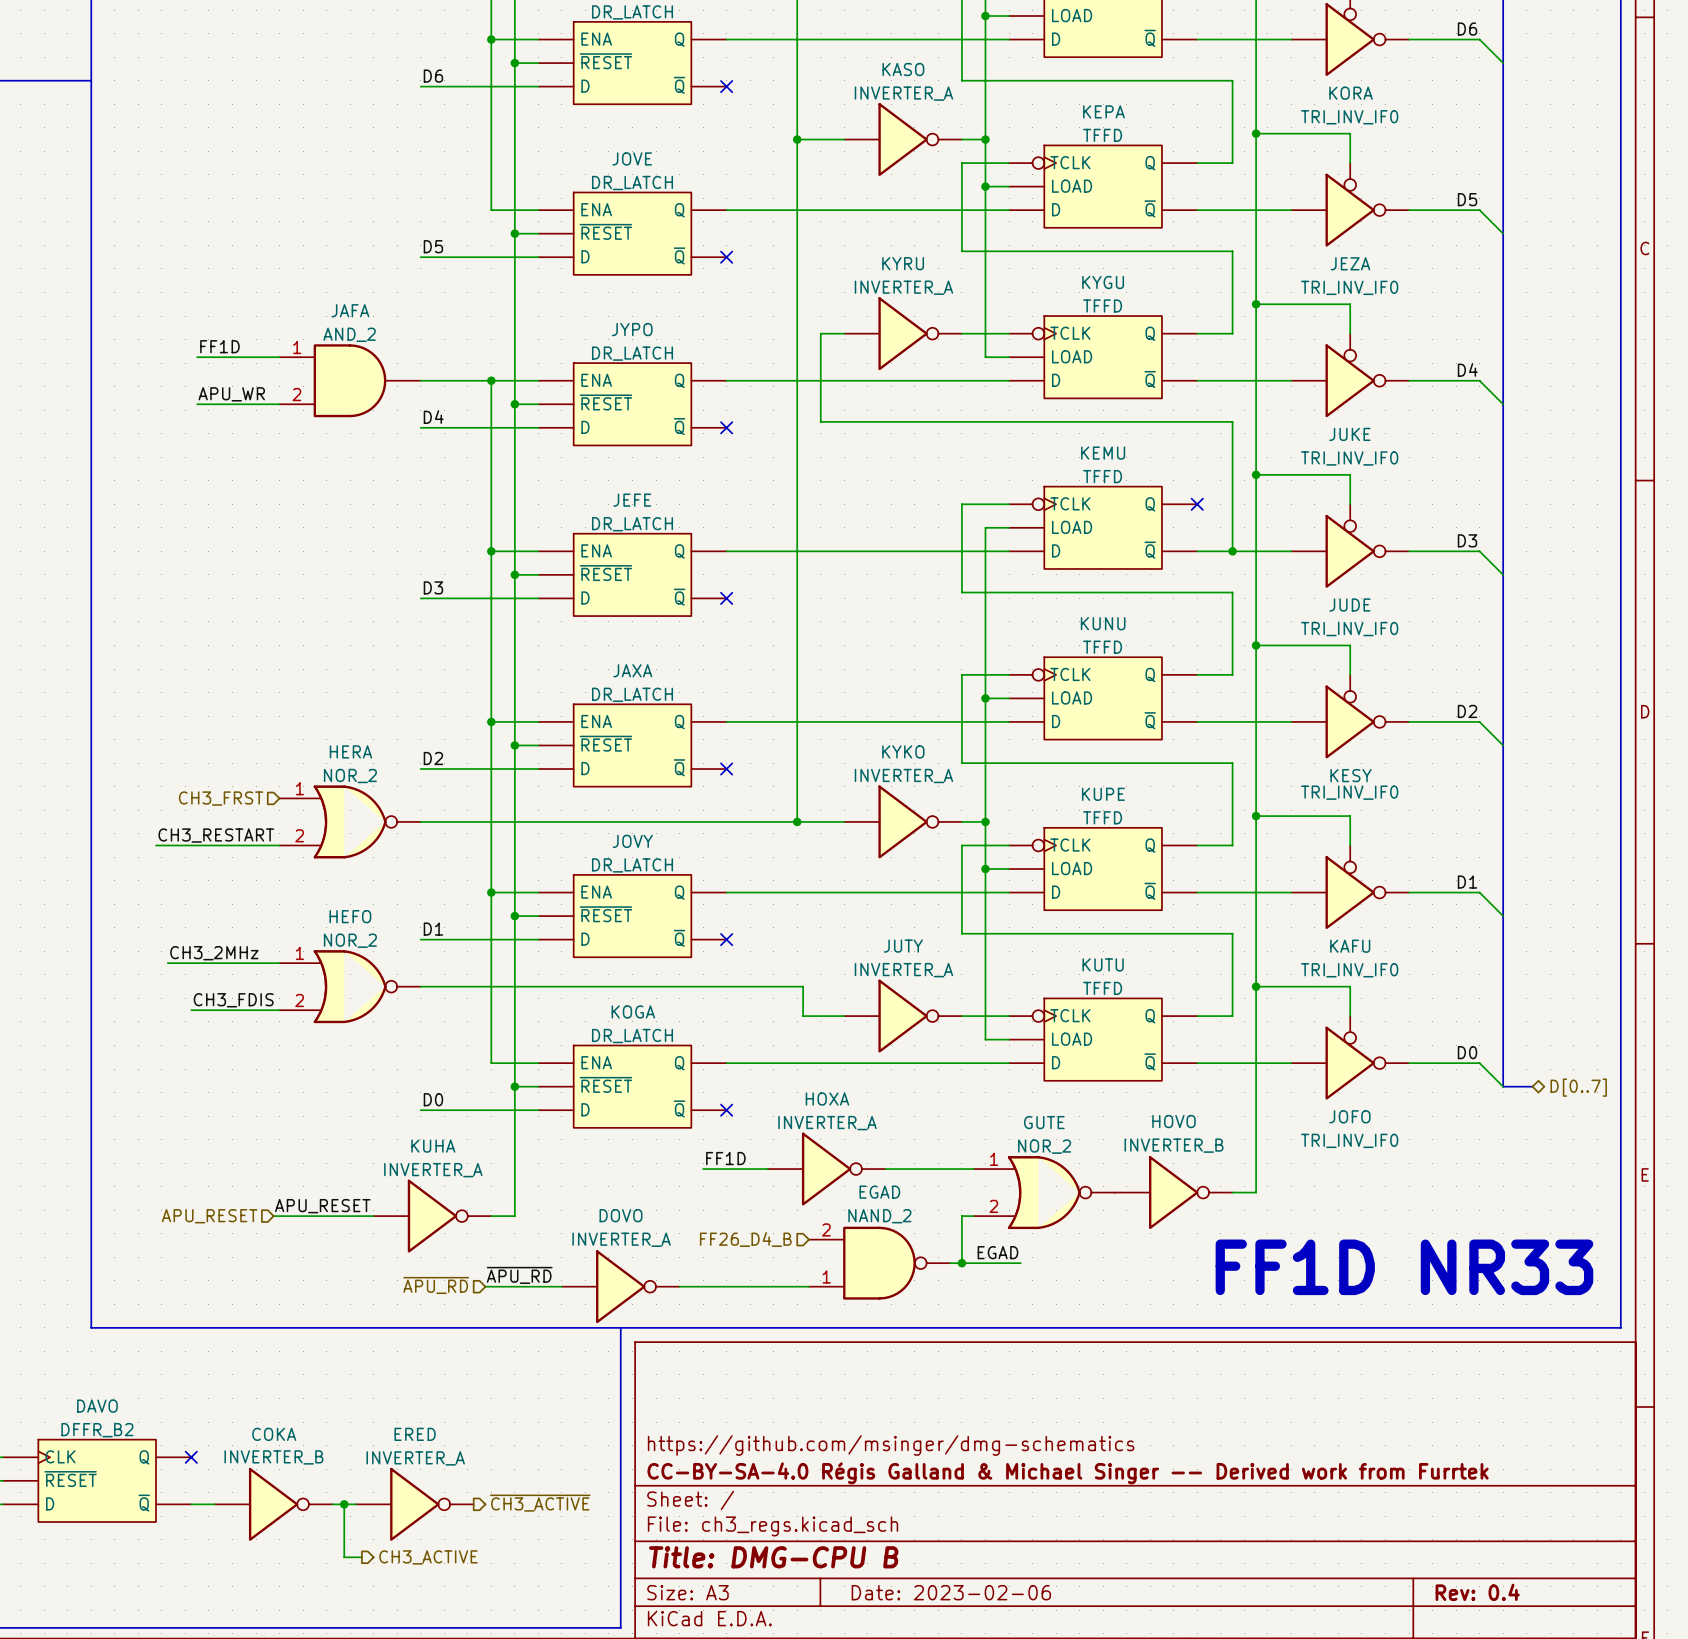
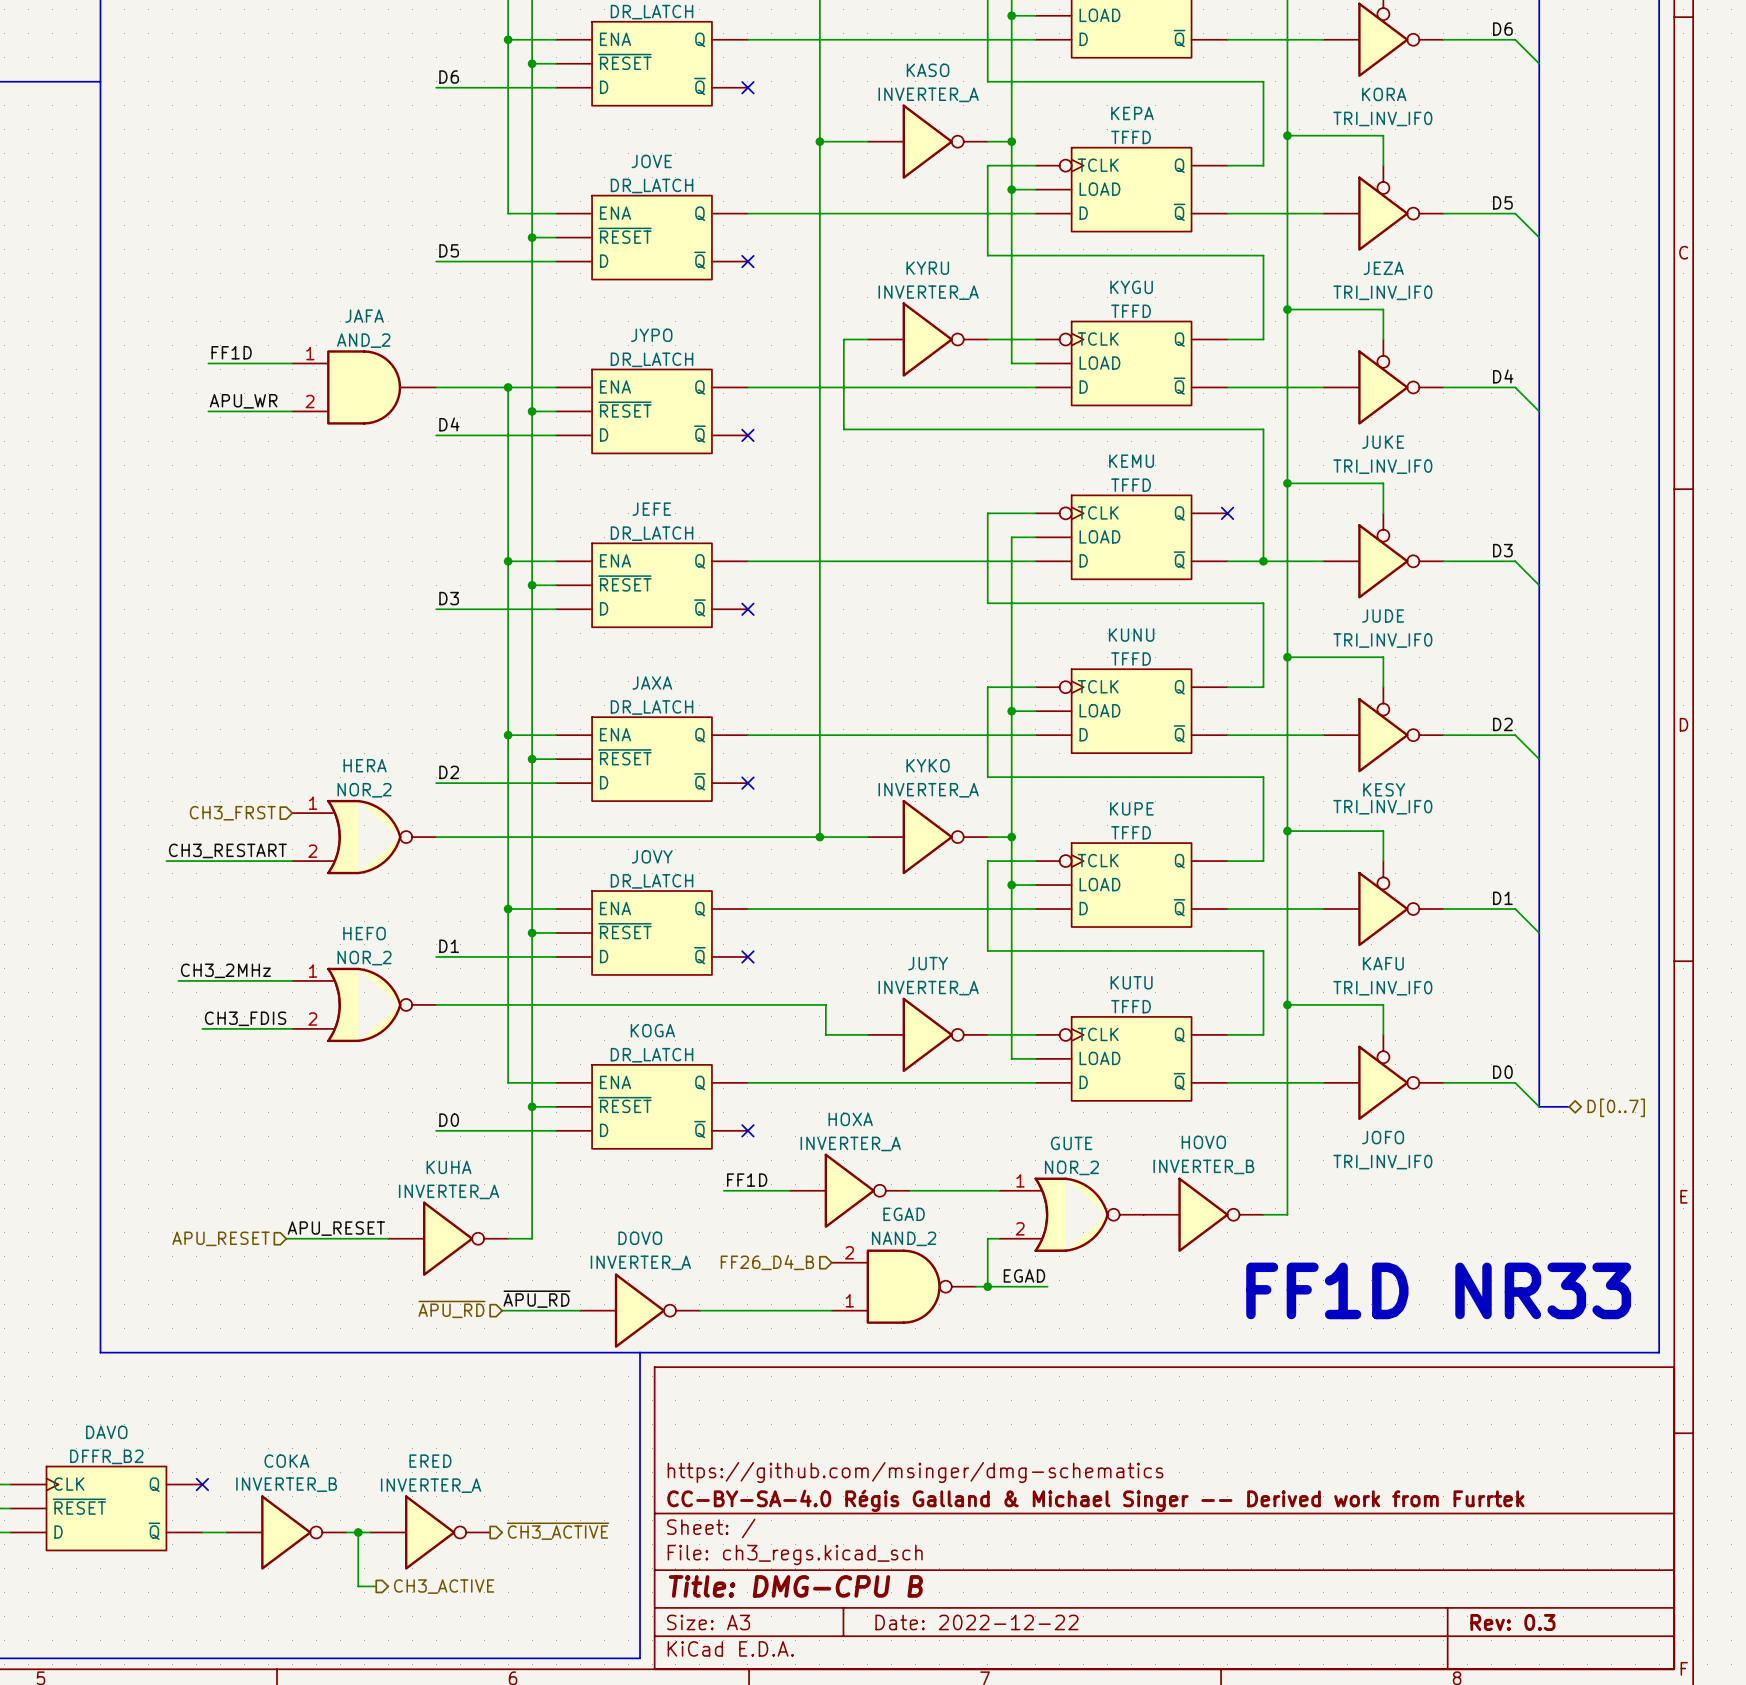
title block: Date: 2023-02-06 (951, 1592) -> Date: 2022-12-22 (976, 1622)
title block: Rev: 0.4 (1477, 1592) -> Rev: 0.3 (1512, 1622)

